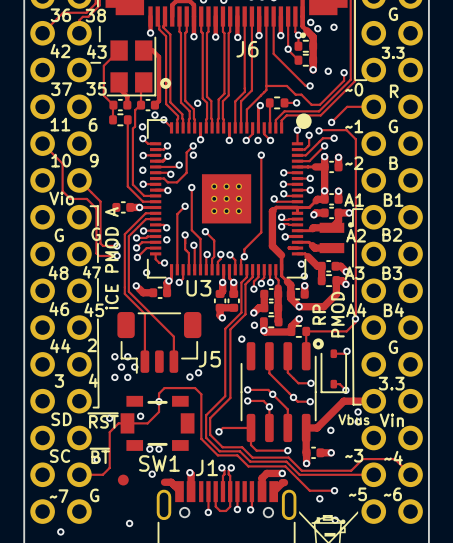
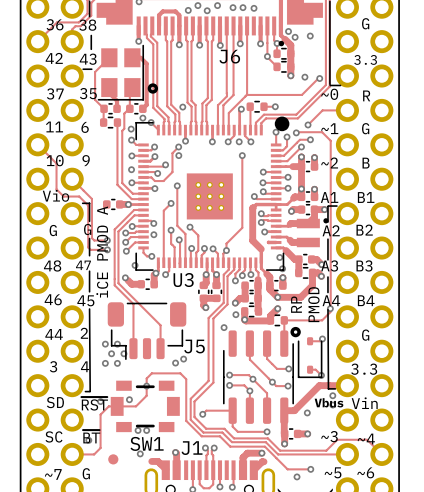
track: (273, 16) (273, 53) (305, 85) (310, 85) -> none
track: none -> (319, 77) (301, 94) (246, 94)
track: (344, 72) (344, 80) (319, 104) (311, 104) (301, 94) (295, 94) (286, 85) (266, 85) -> none
via: (310, 85) -> none

